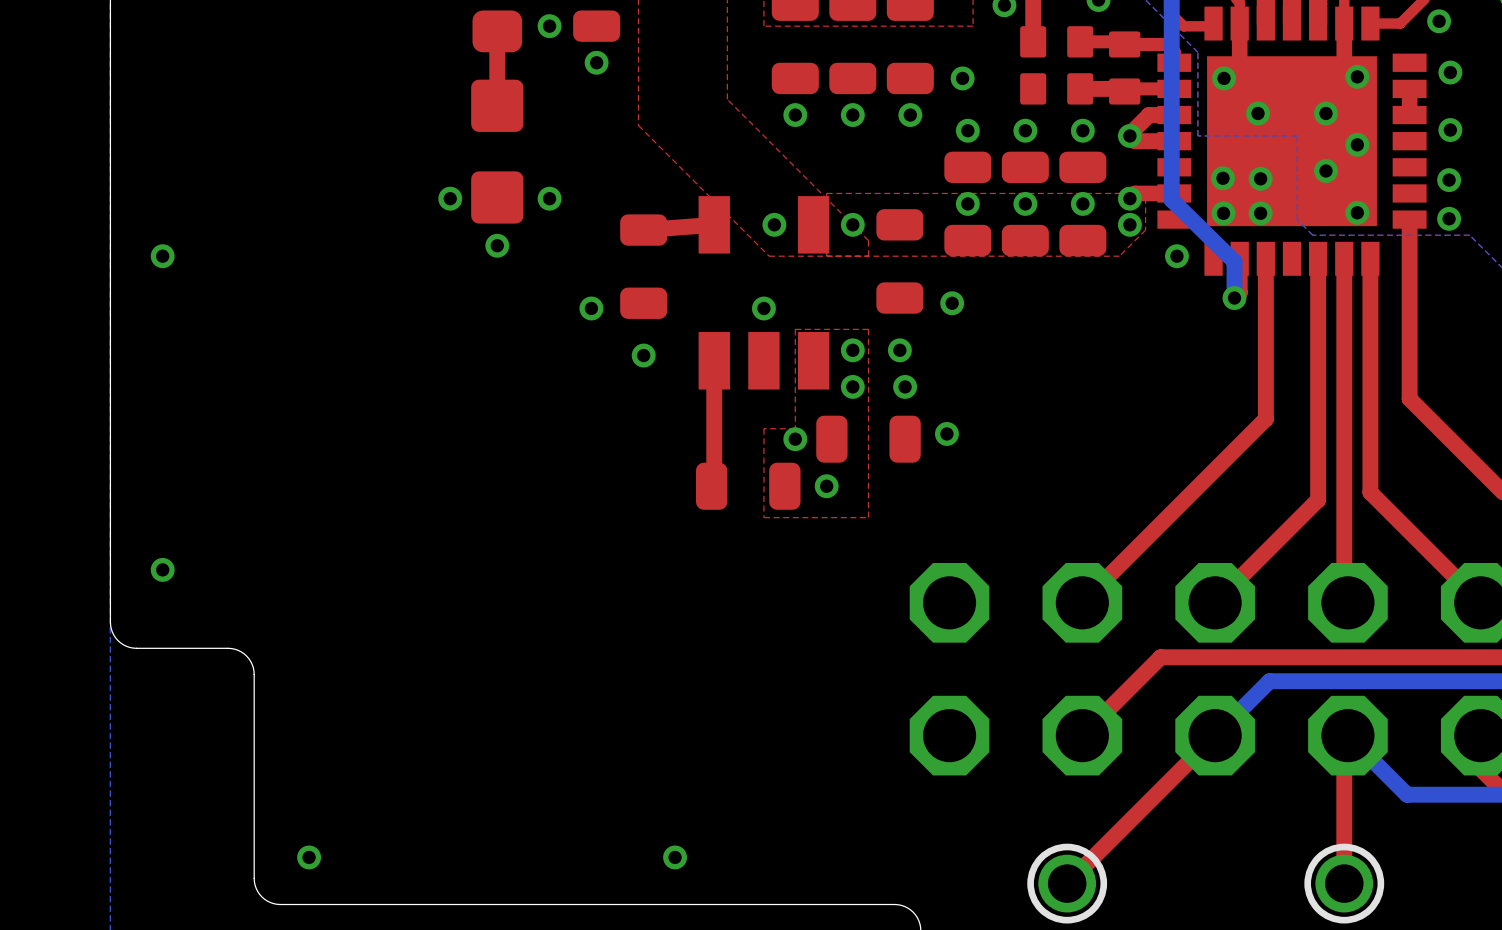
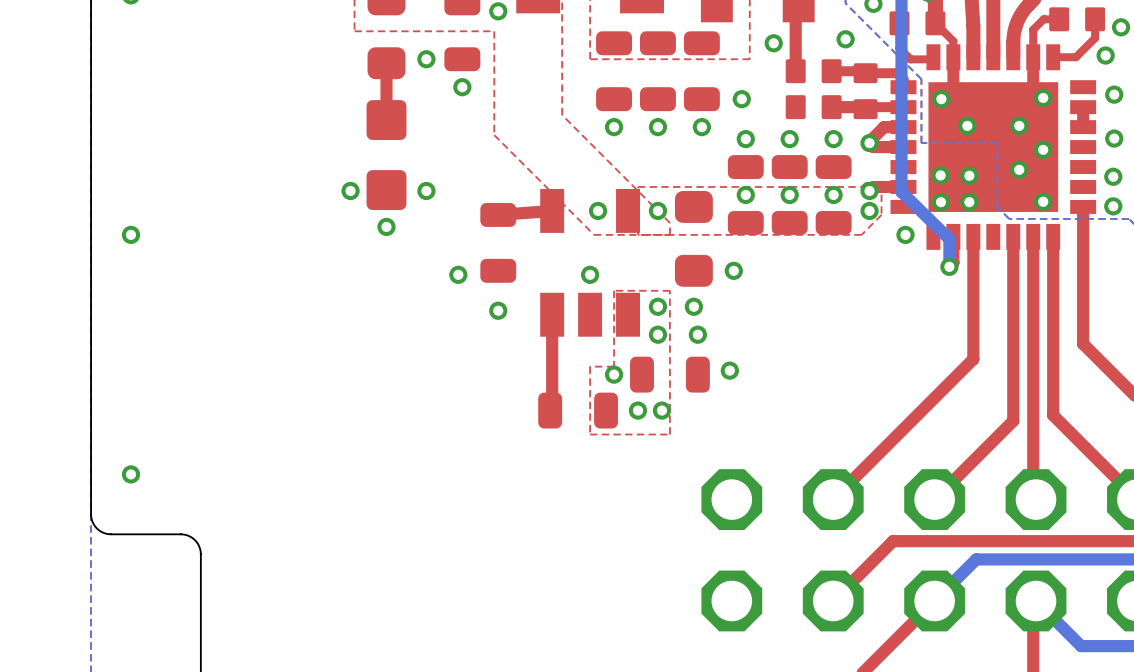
part footprint: [876, 209, 924, 314] -> [674, 190, 713, 287]
via: none -> (661, 410)

